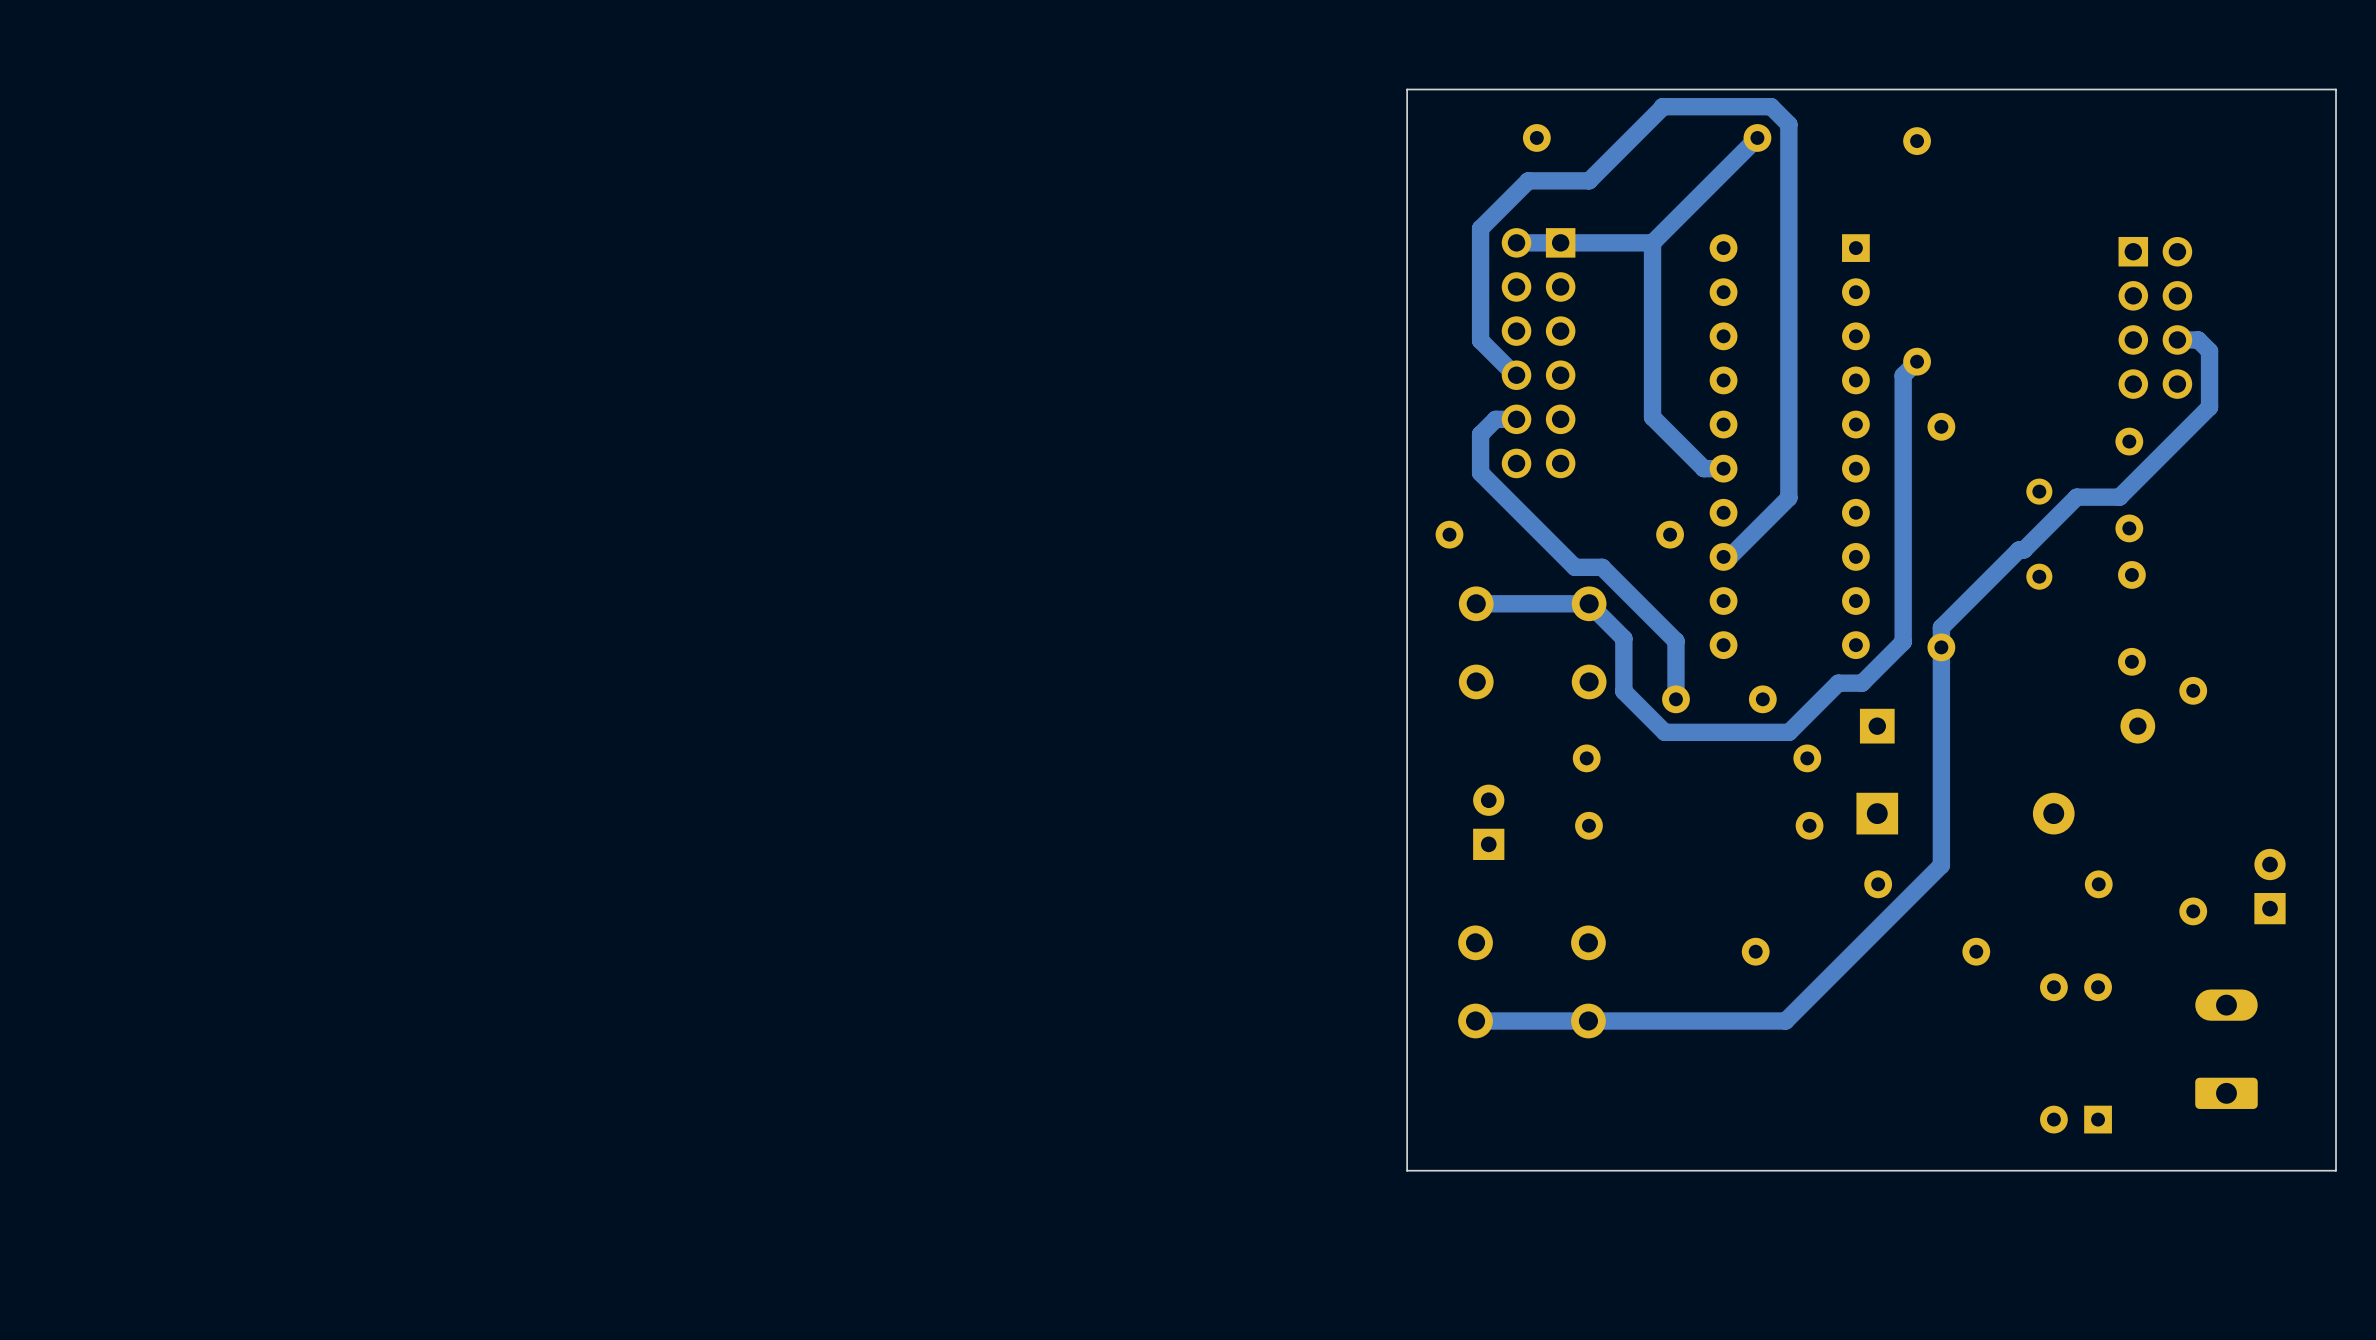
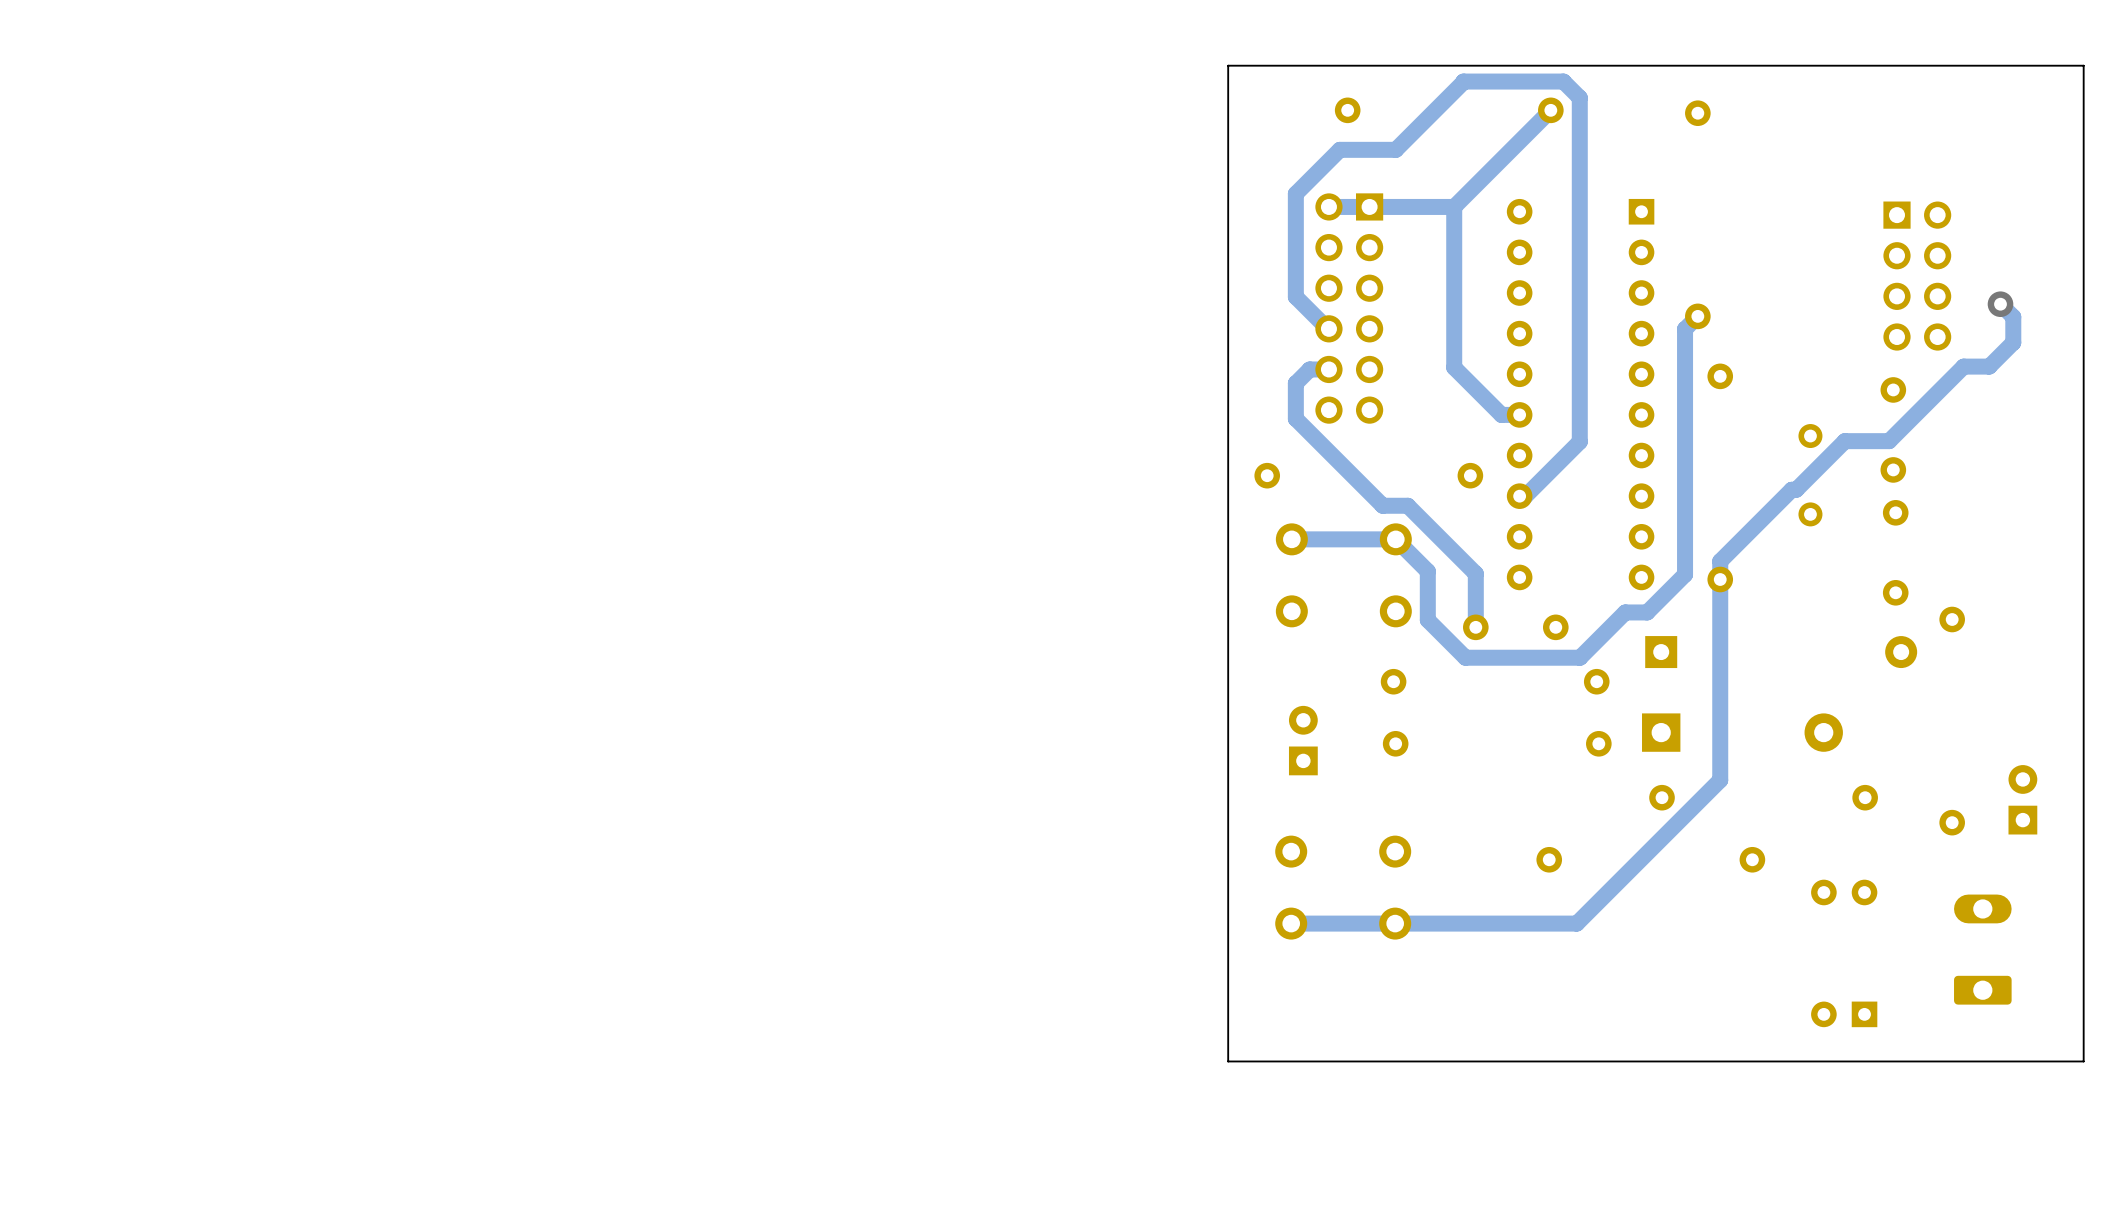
track: (2177, 339) (2198, 339) (2209, 351) (2209, 407) (2119, 497) -> (2000, 304) (2013, 317) (2013, 342) (1989, 366) (1963, 366) (1889, 441) (1884, 441)
via: none -> (2000, 304)

